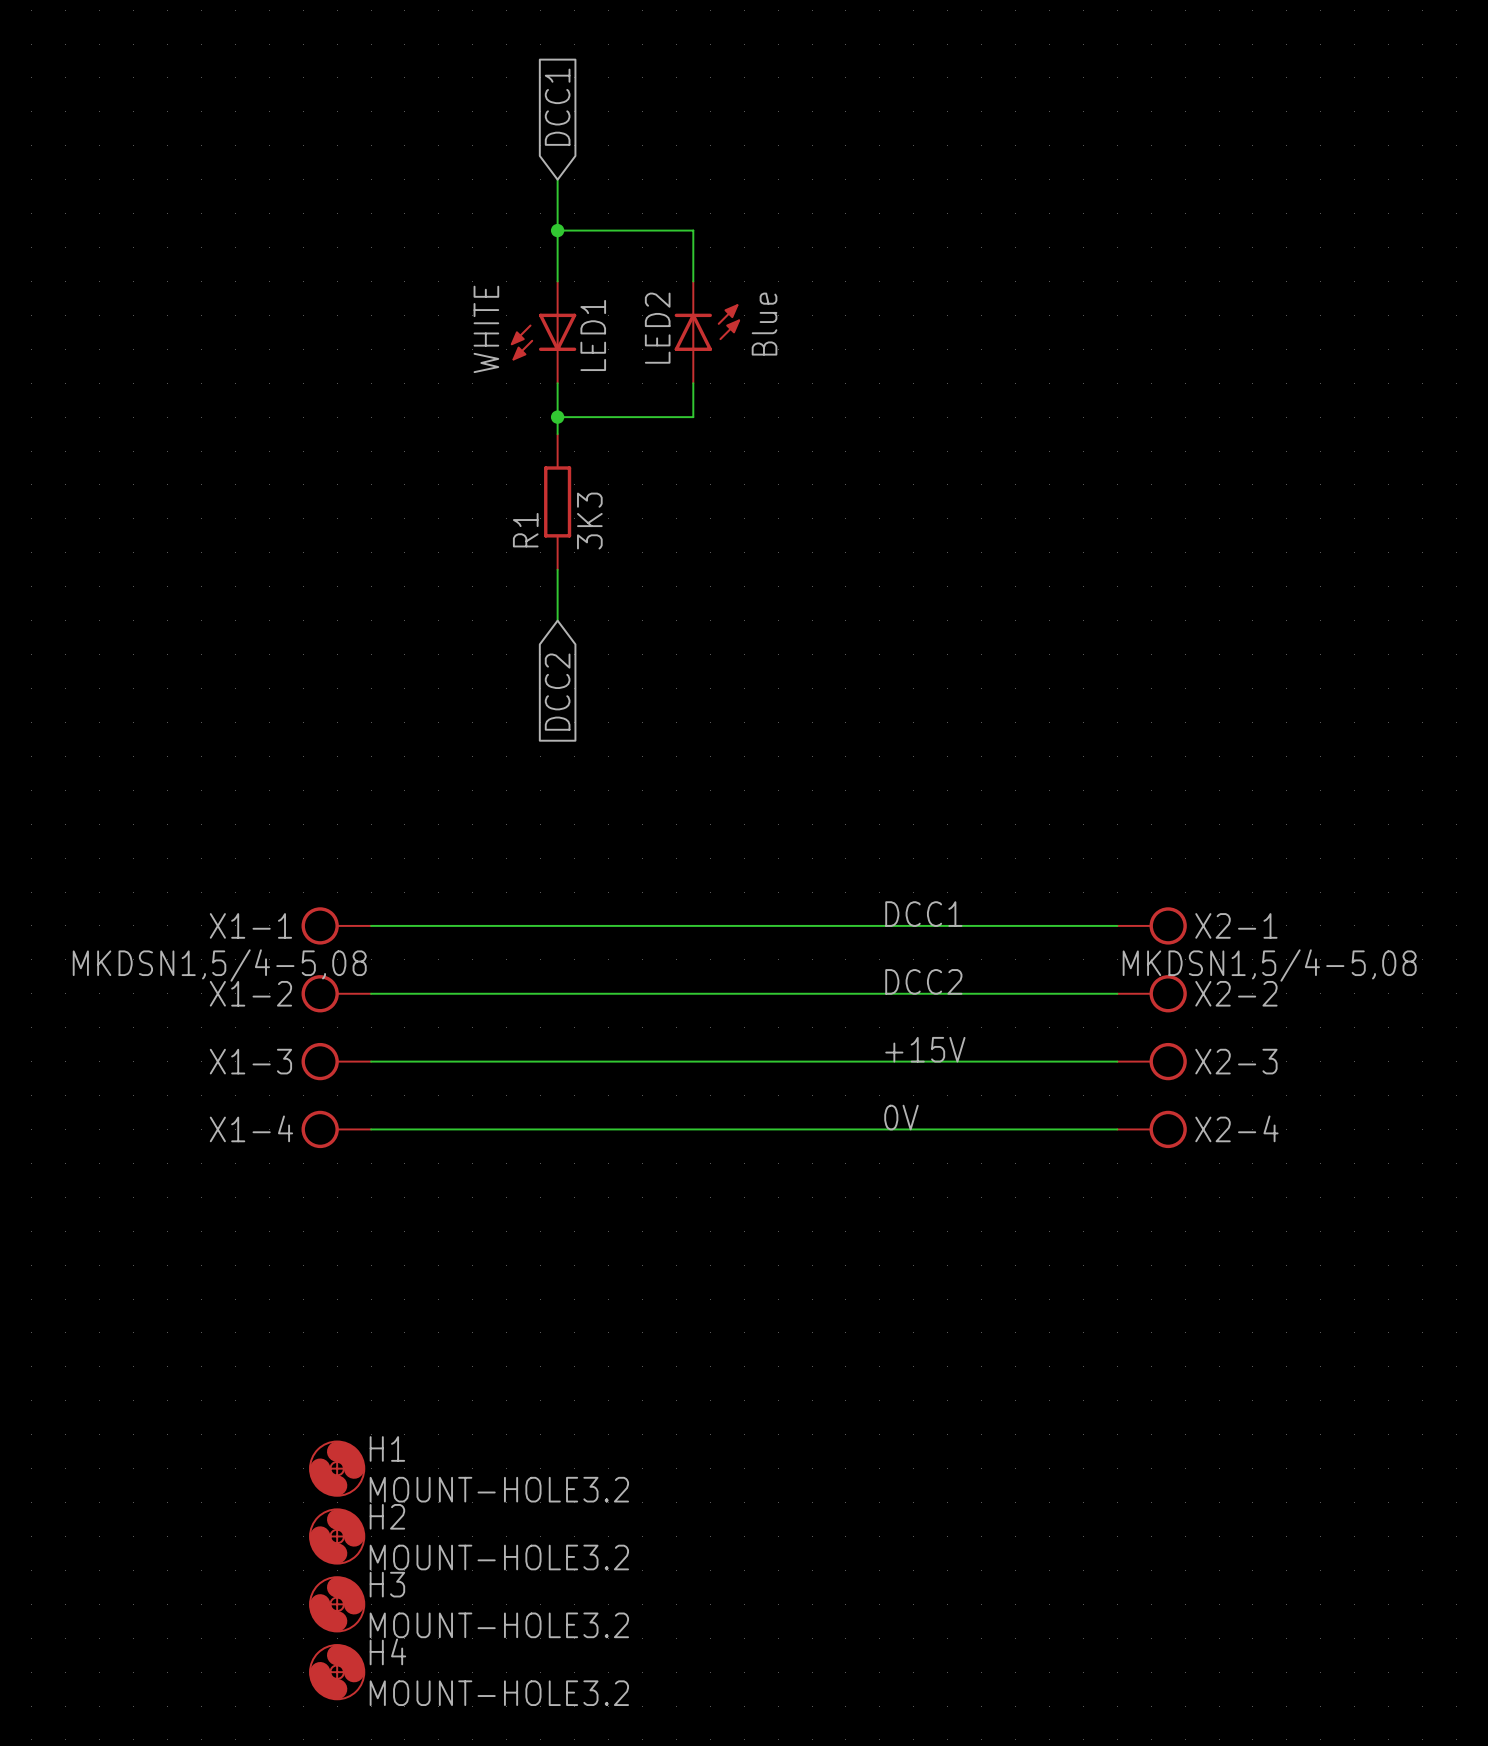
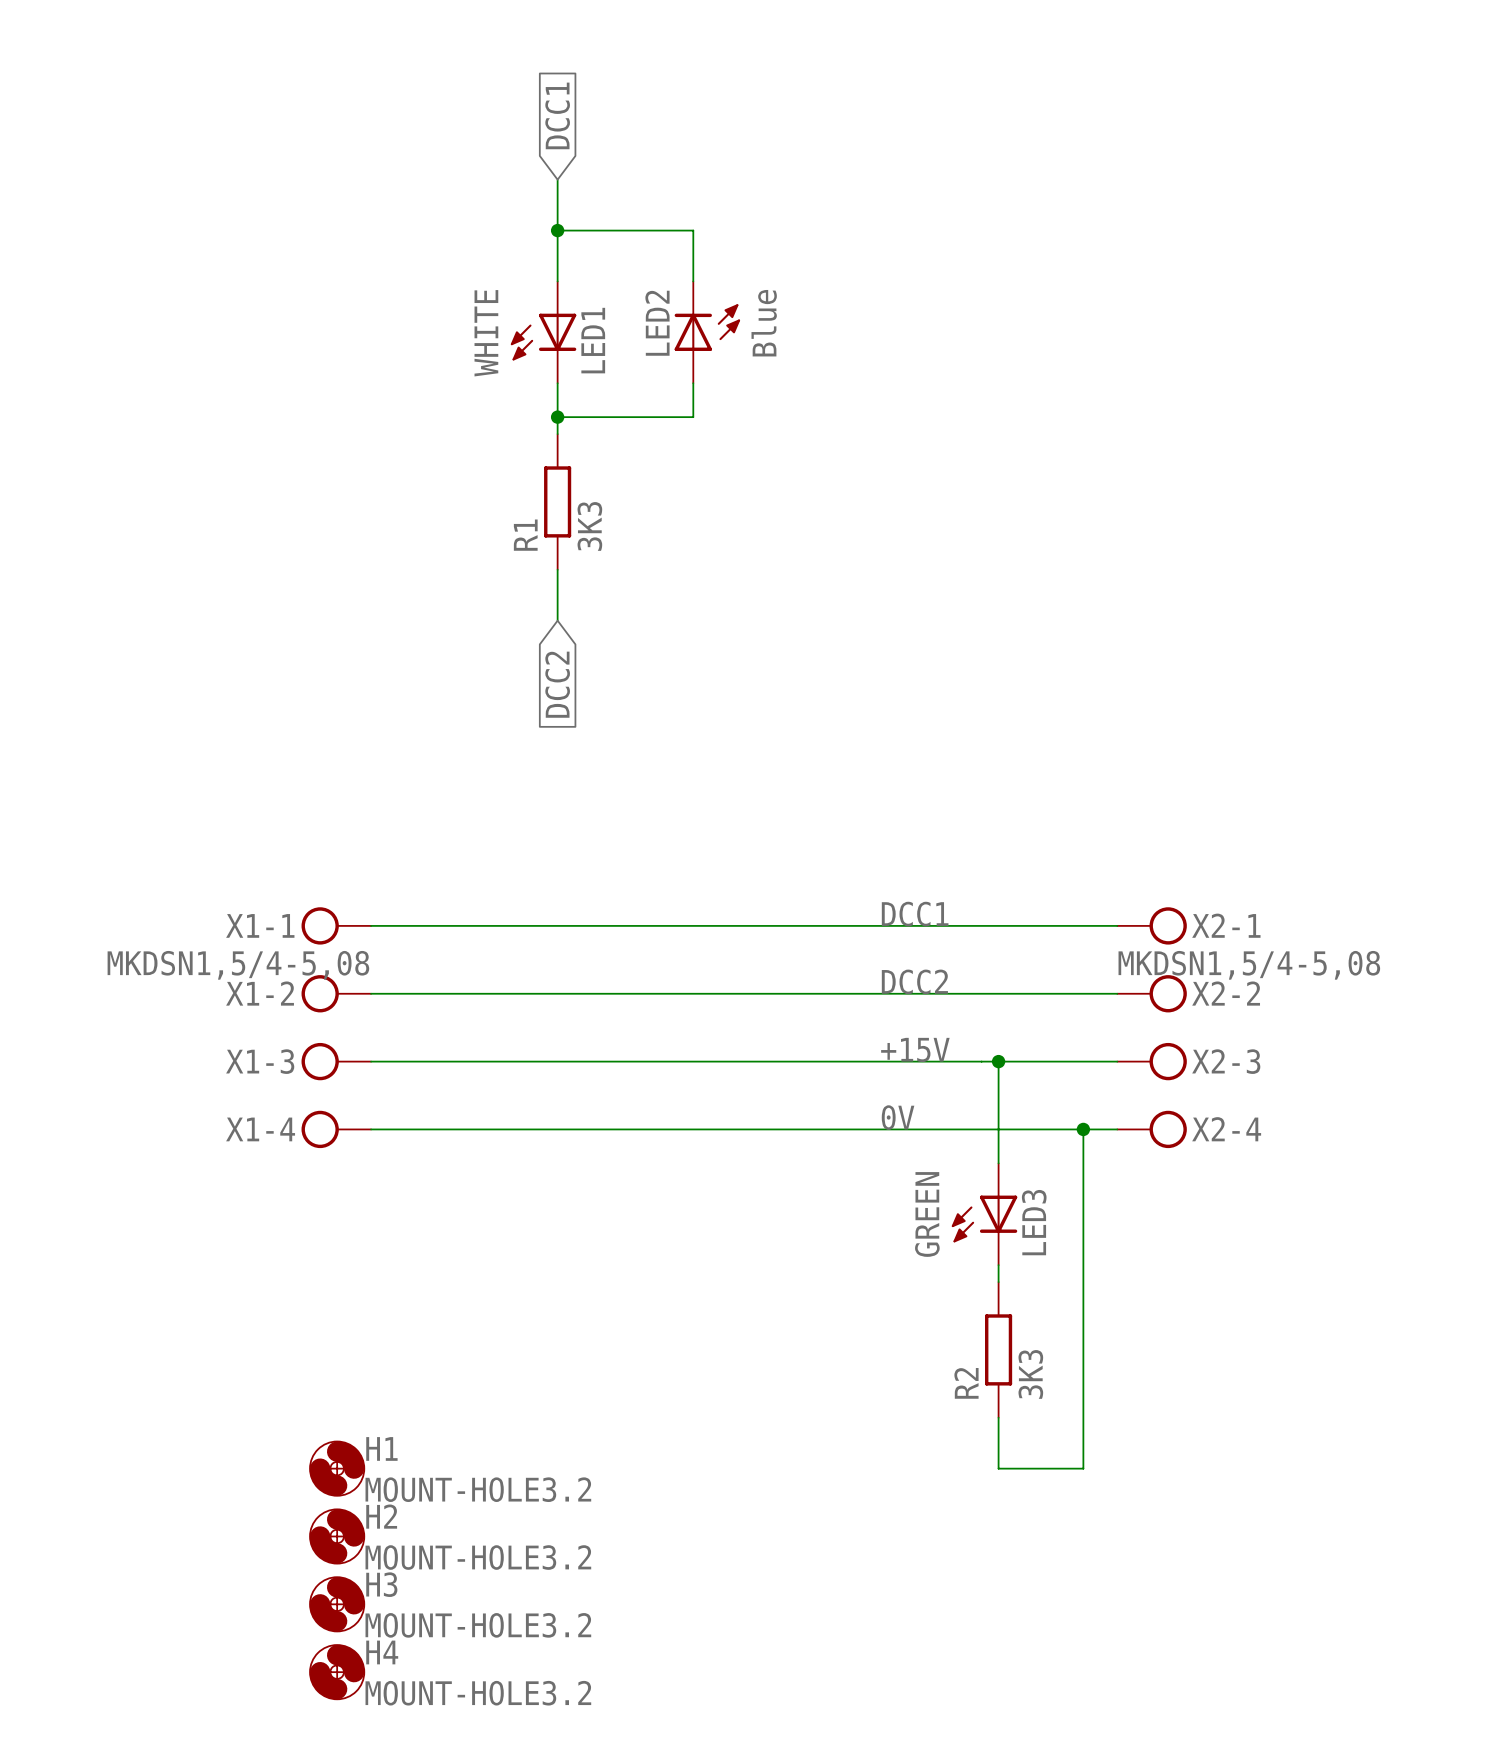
wire: none -> (998, 1061) (998, 1163)
junction: none -> (998, 1061)
wire: none -> (1083, 1129) (1083, 1468) (998, 1468) (998, 1417)
junction: none -> (1083, 1129)
LED3: none -> GREEN (984, 1214)
wire: none -> (998, 1265) (998, 1282)
R2: none -> 3K3 (998, 1349)

